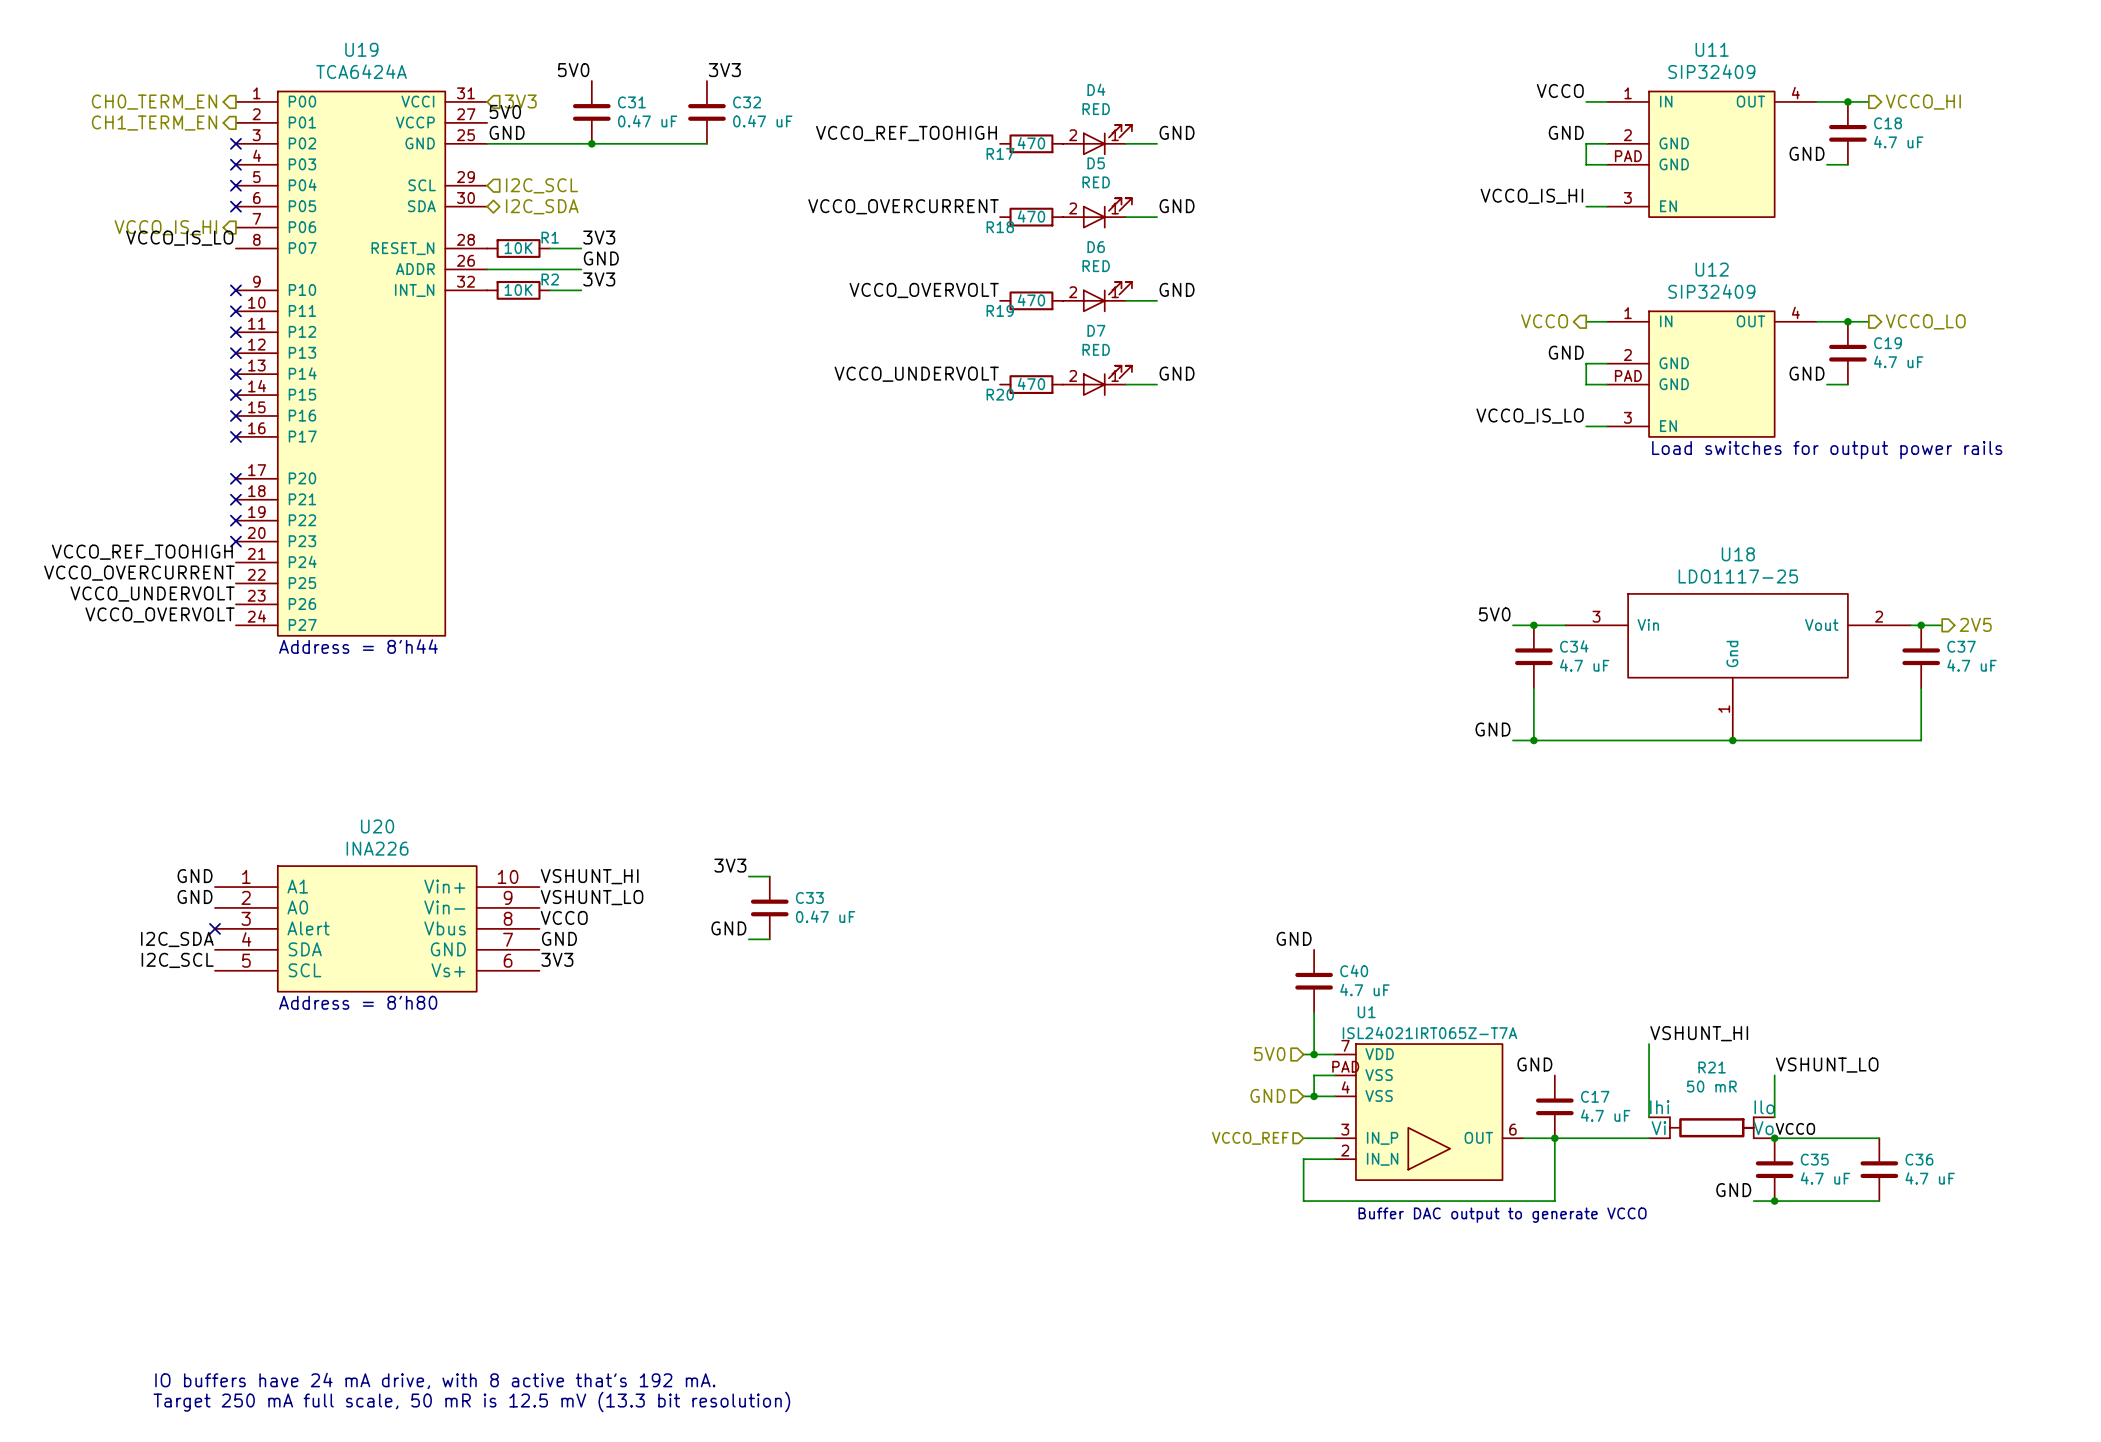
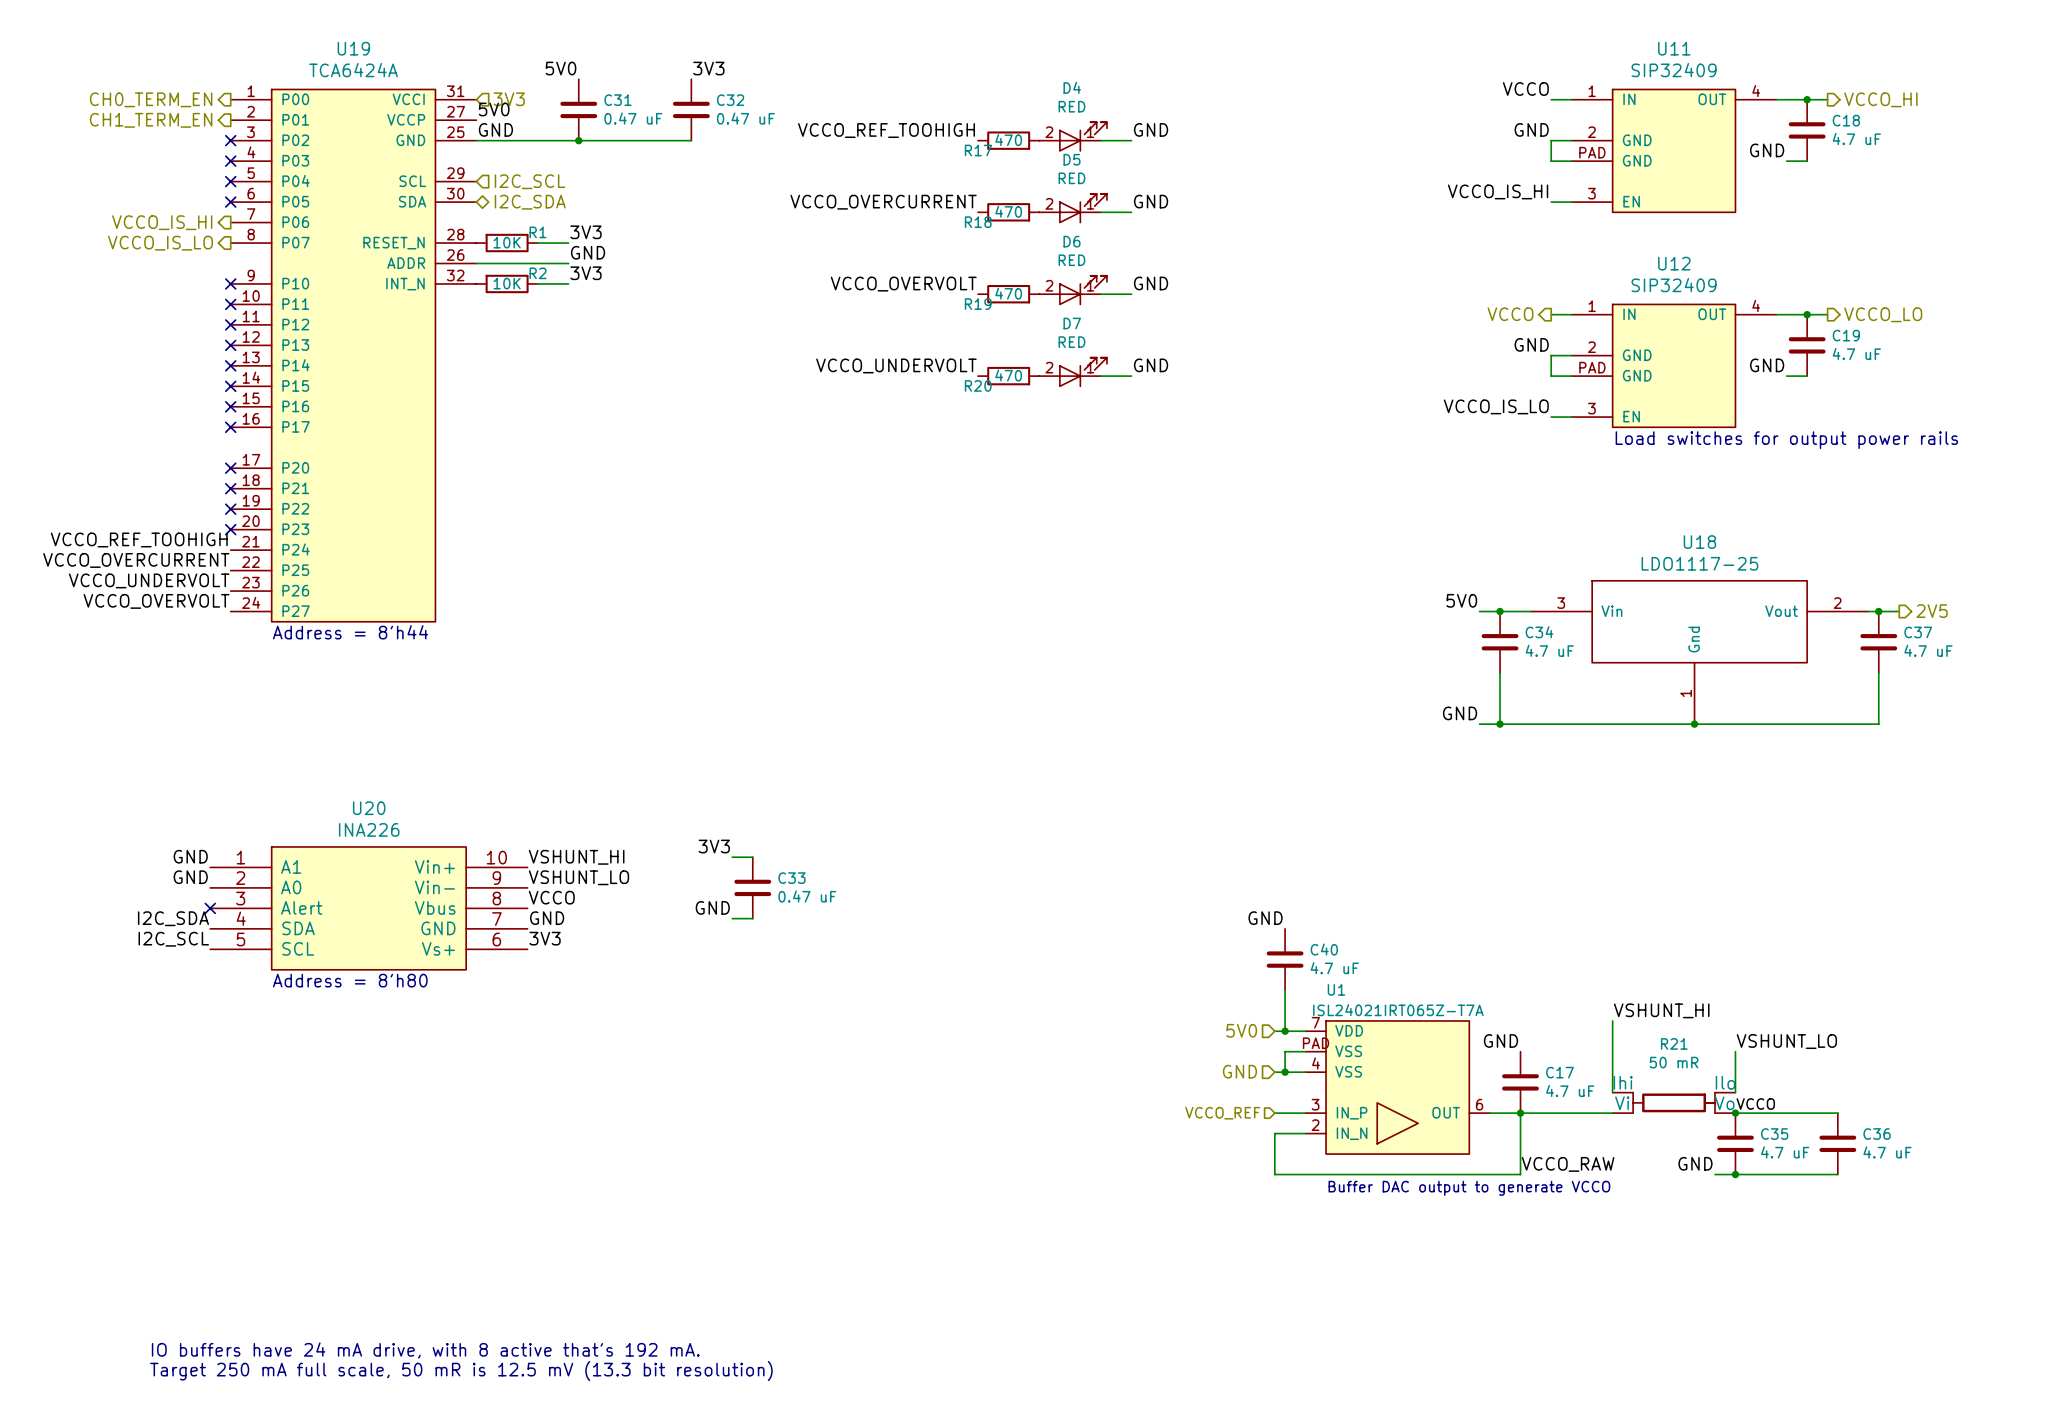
label: VCCO_IS_LO (179, 238) -> none
hierarchical label: none -> VCCO_IS_LO (160, 243)
label: none -> VCCO_RAW (1568, 1164)

